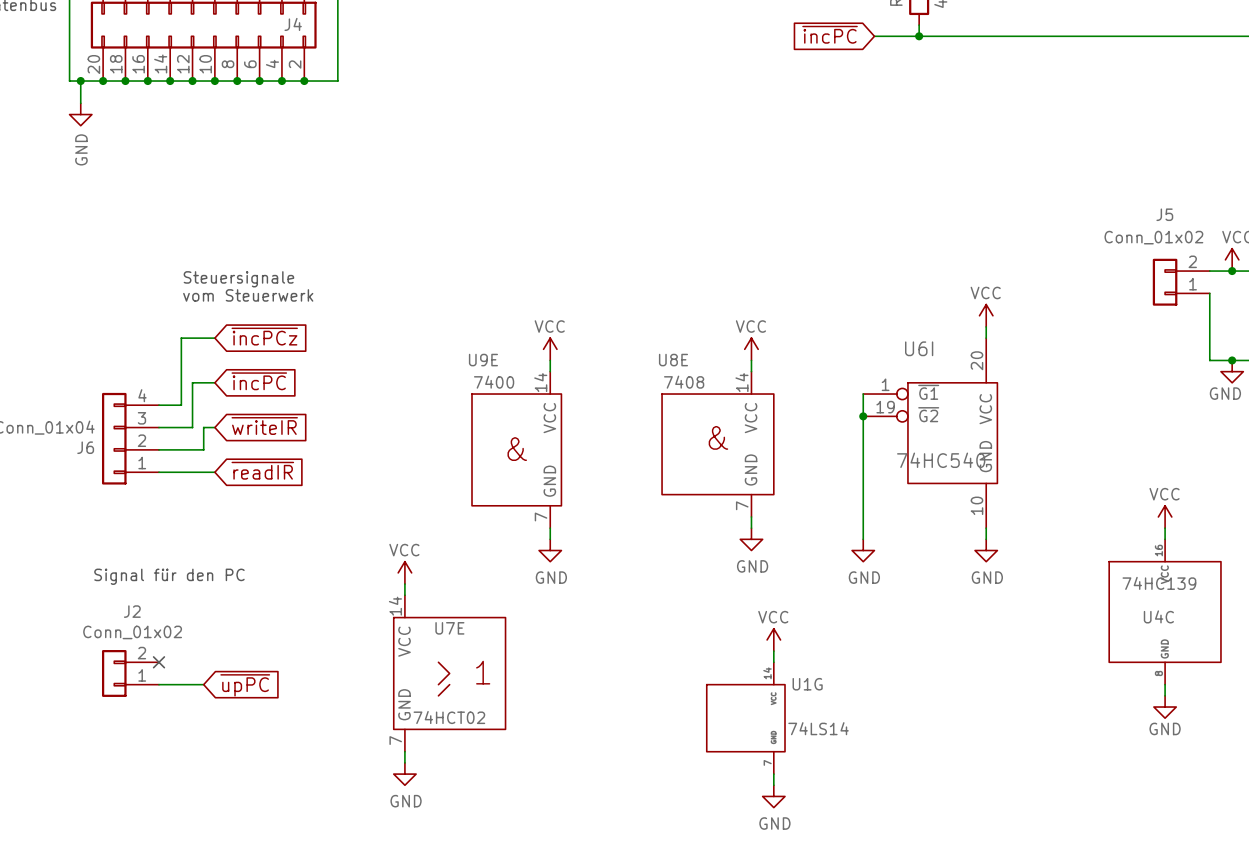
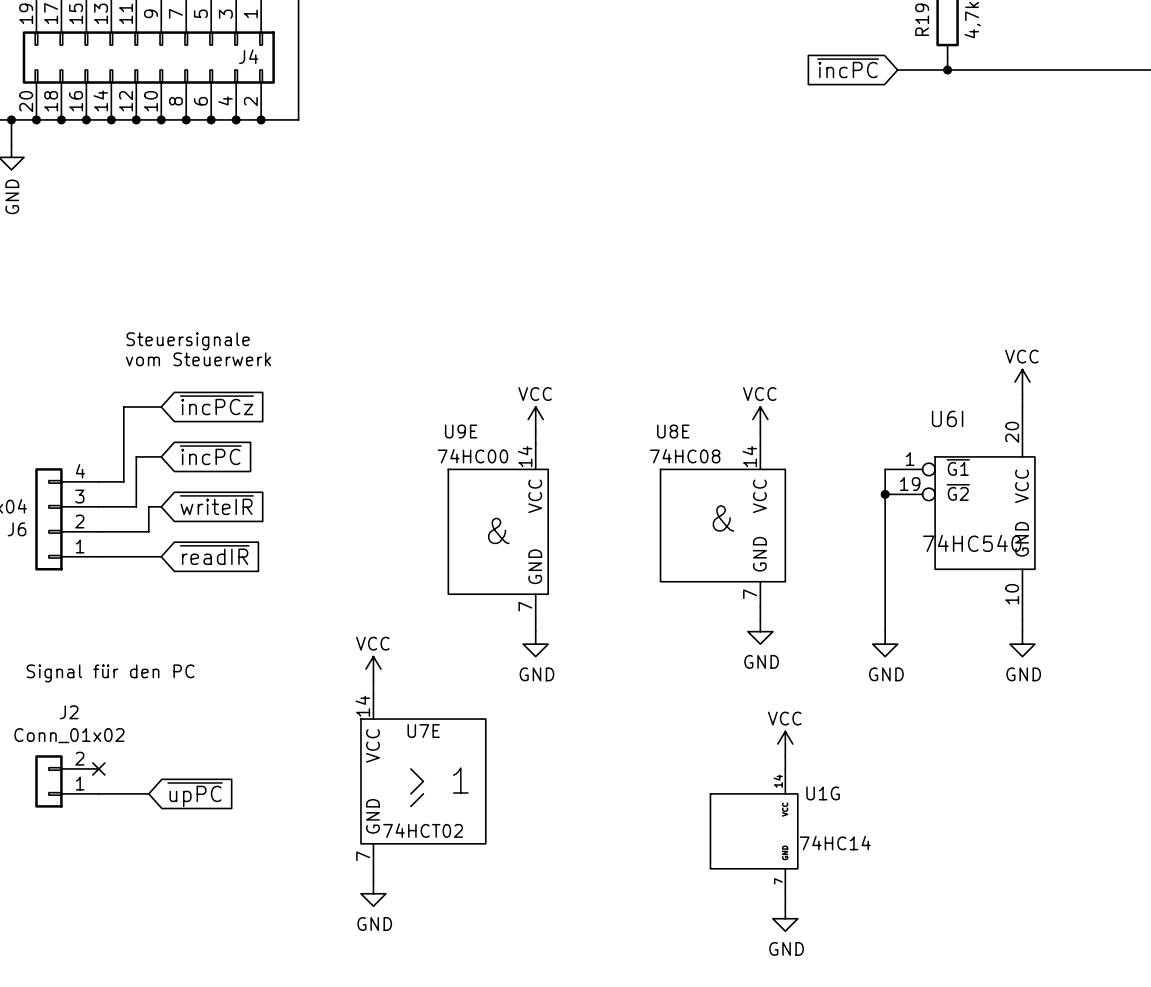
U9E value: 7400 (494, 382) -> 74HC00 (473, 456)
U8E value: 7408 (684, 382) -> 74HC08 (685, 456)
U1G value: 74LS14 (818, 728) -> 74HC14 (835, 843)

